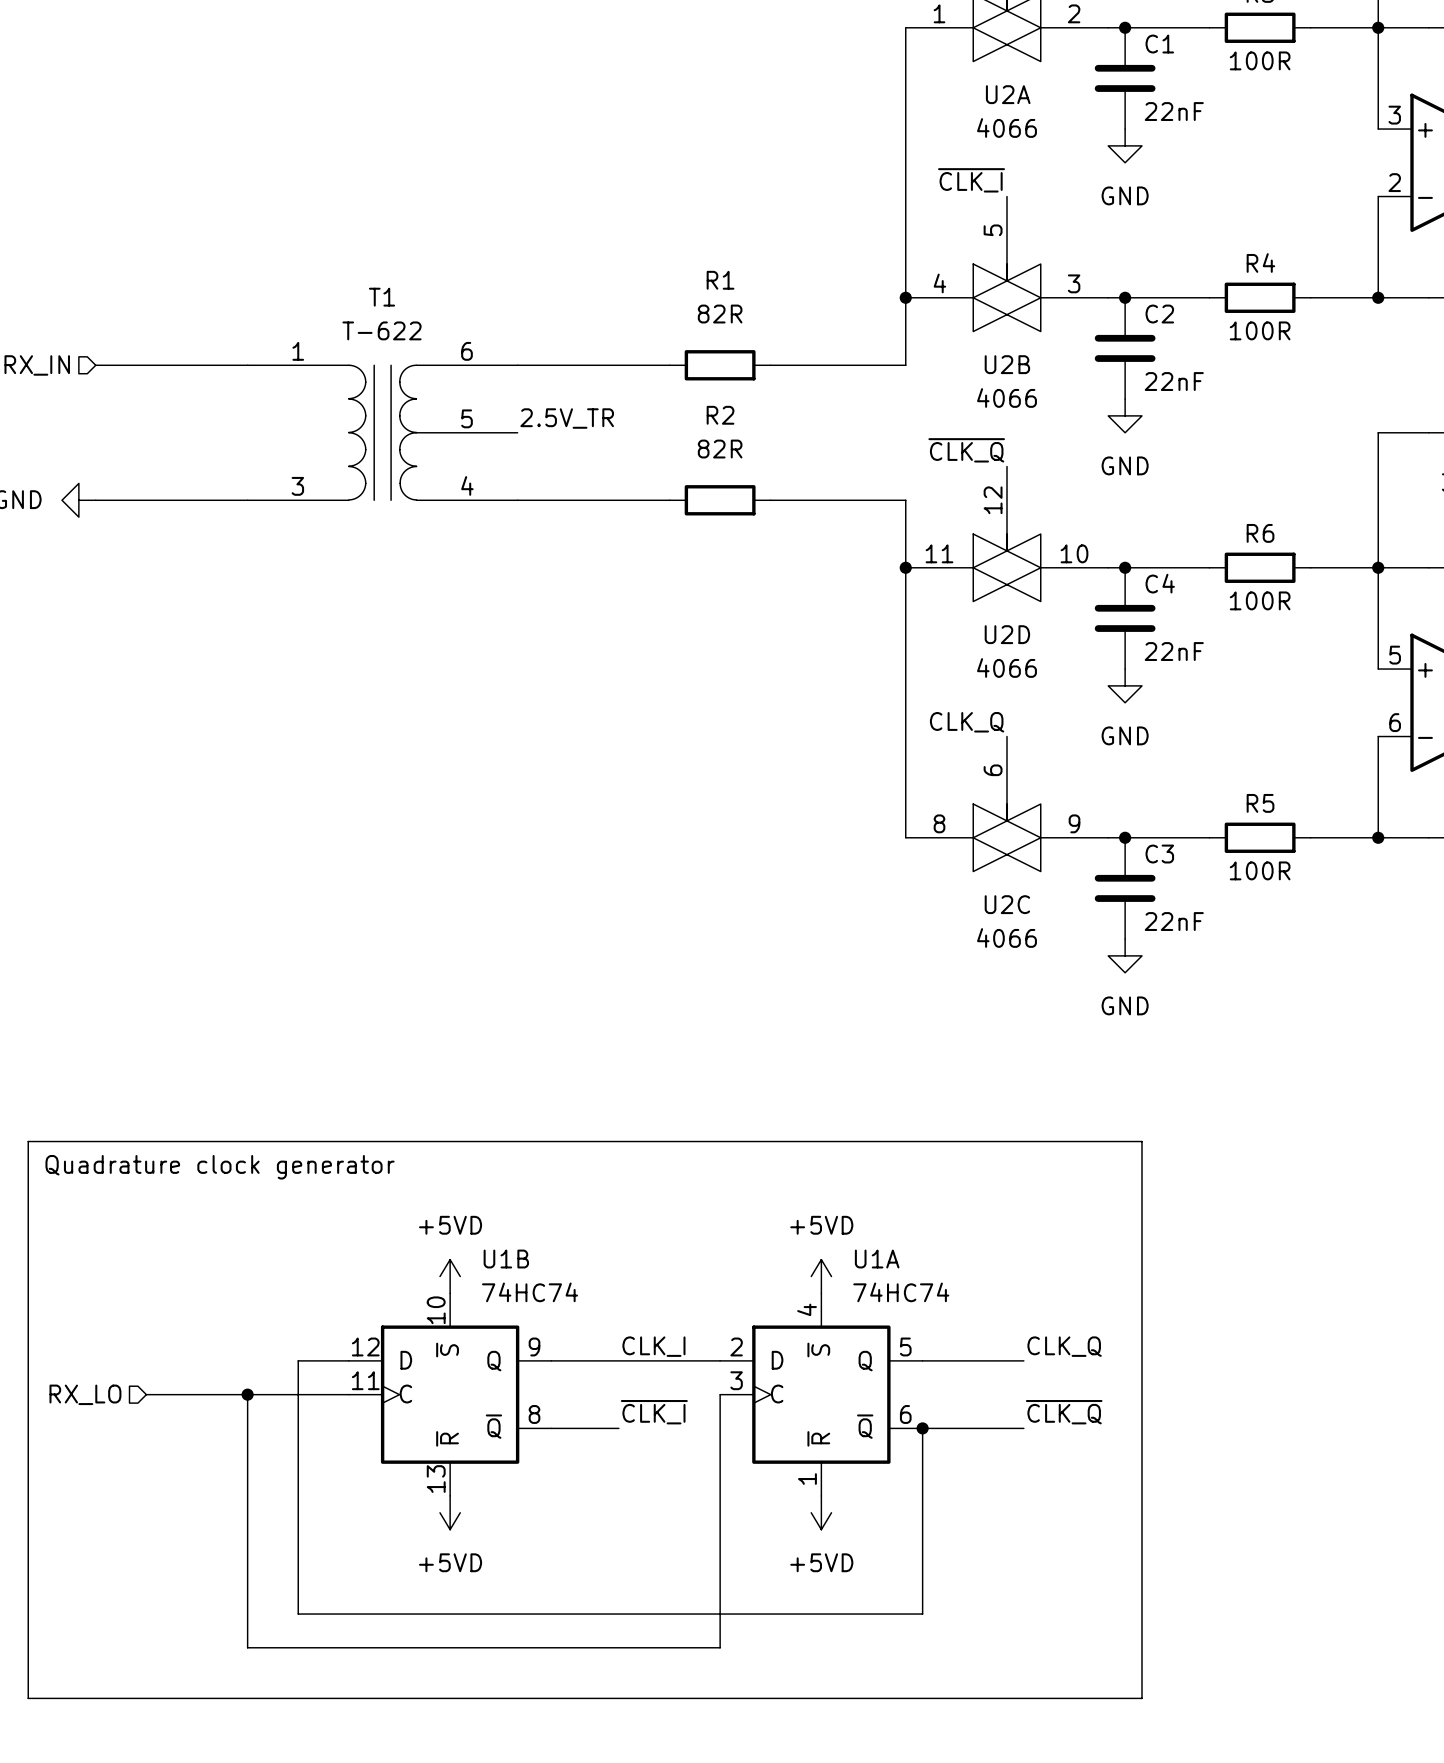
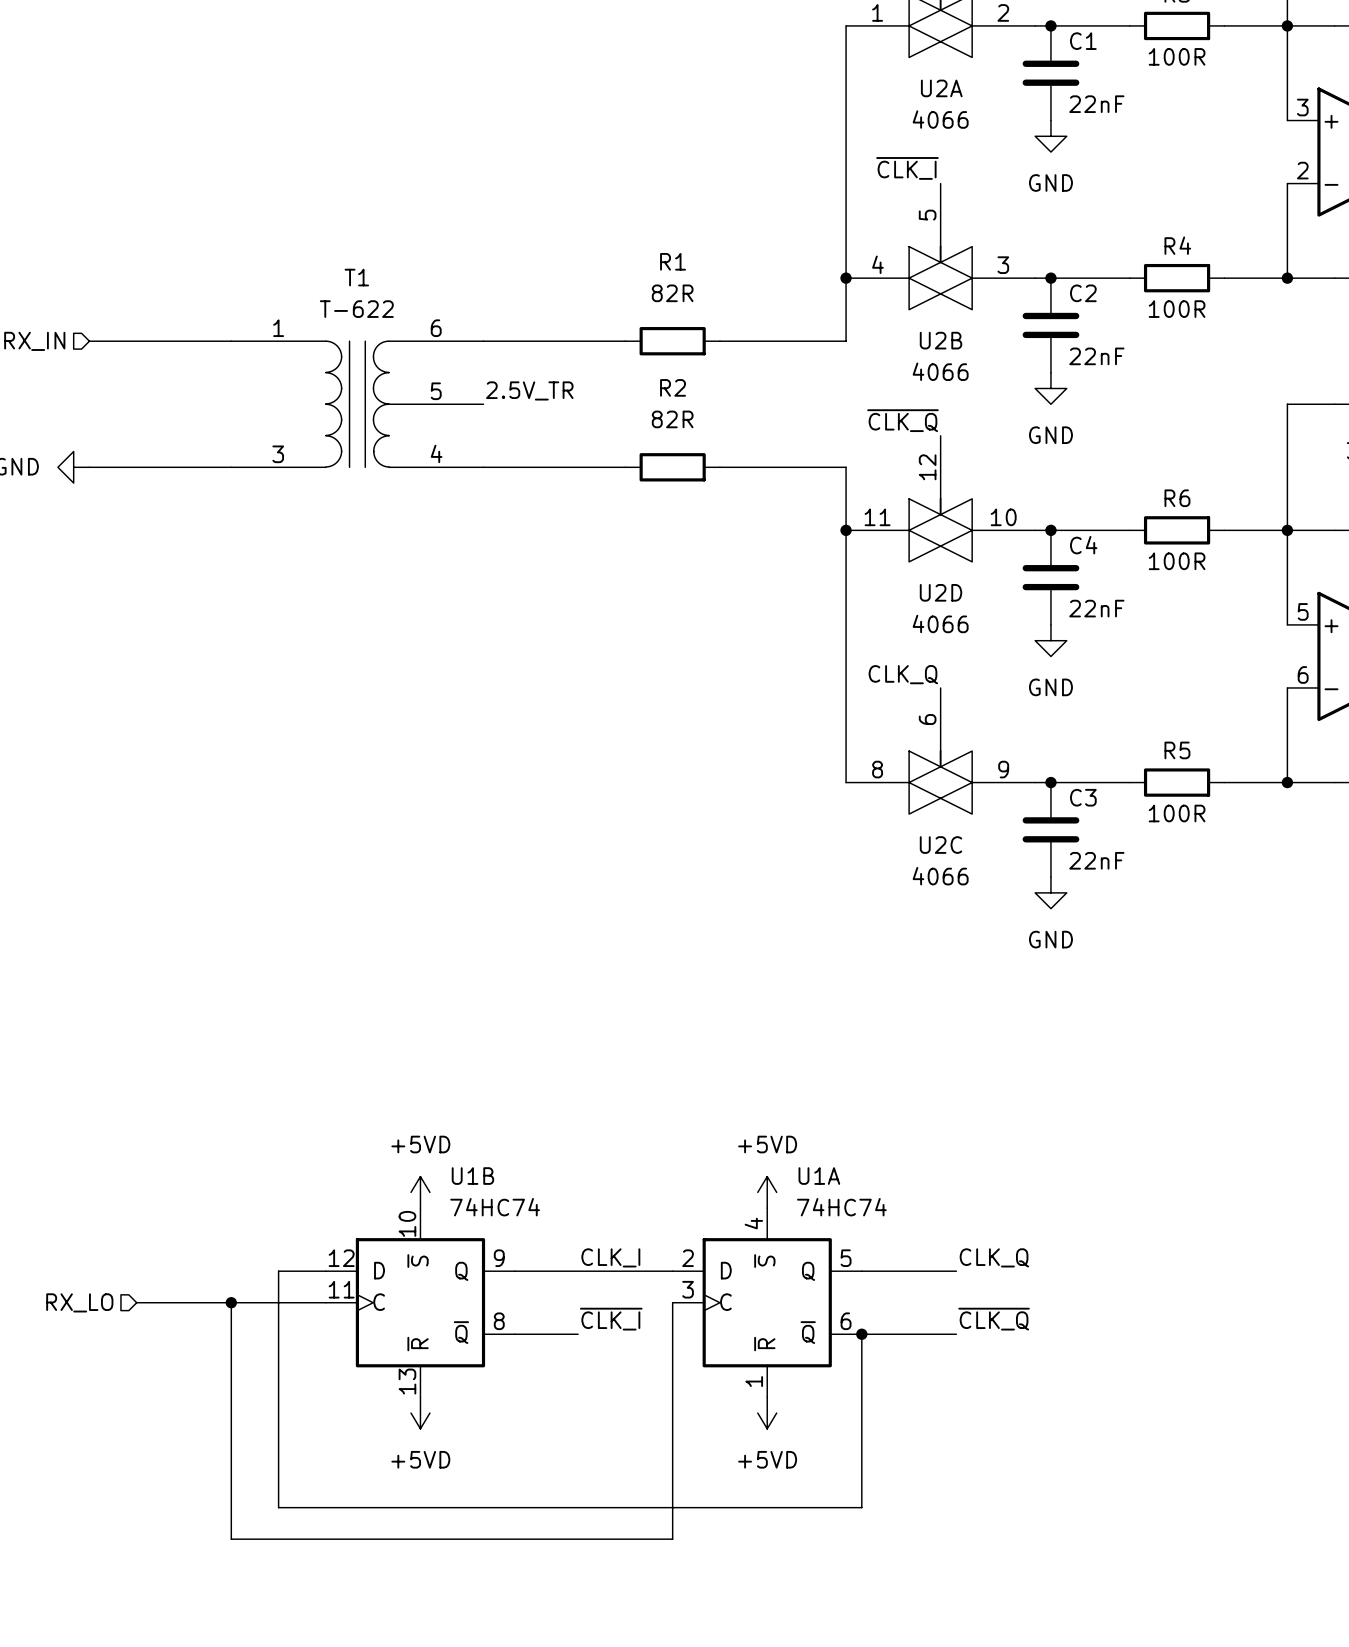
line: (28, 1141) (1142, 1141) (1142, 1698) (28, 1698) (28, 1141) -> none
text: Quadrature clock generator (220, 1167) -> none

